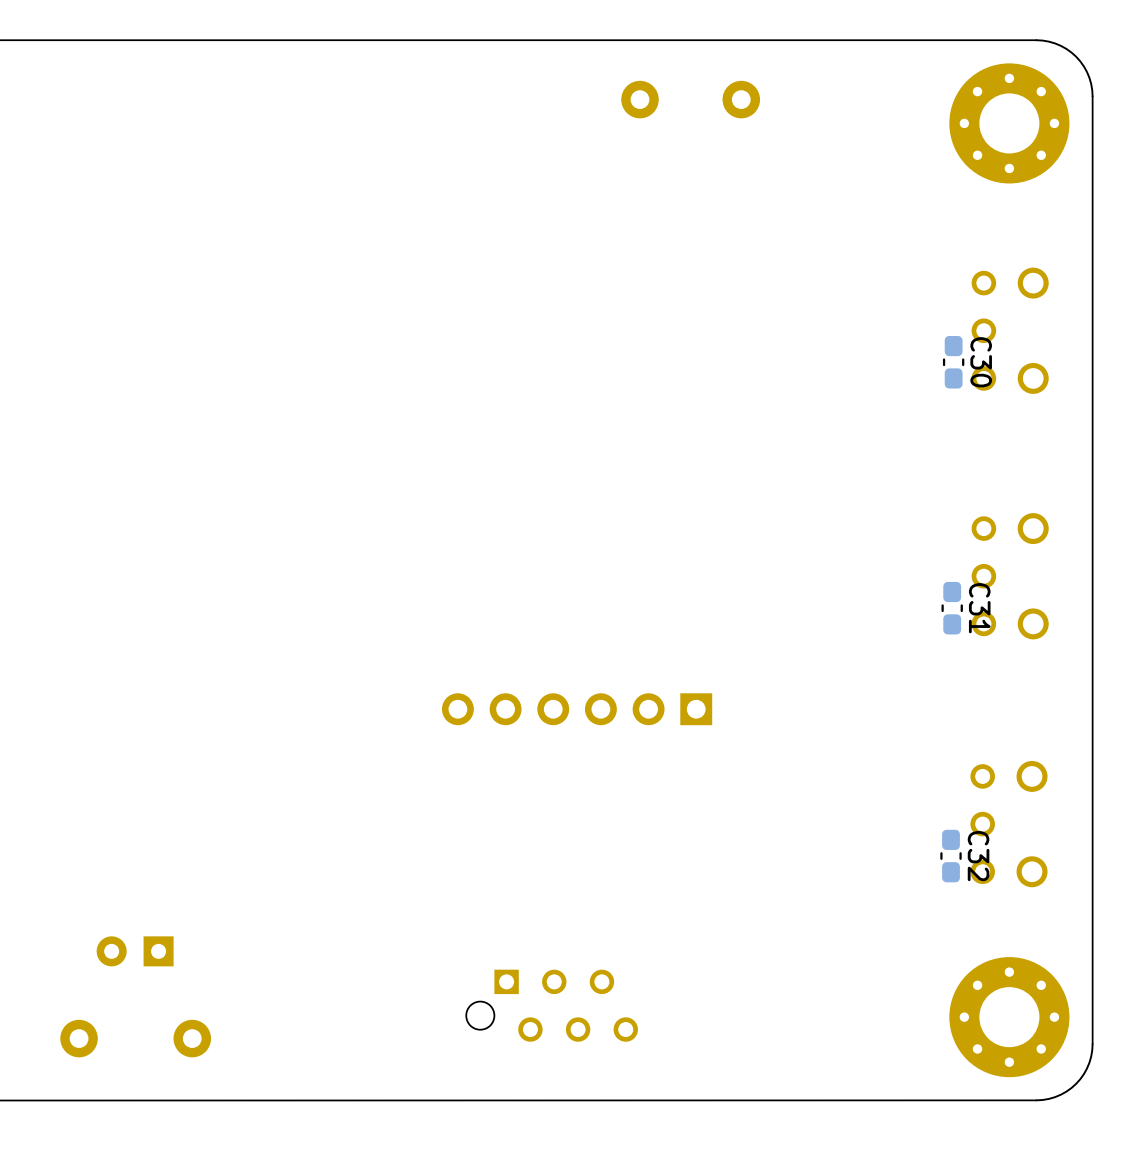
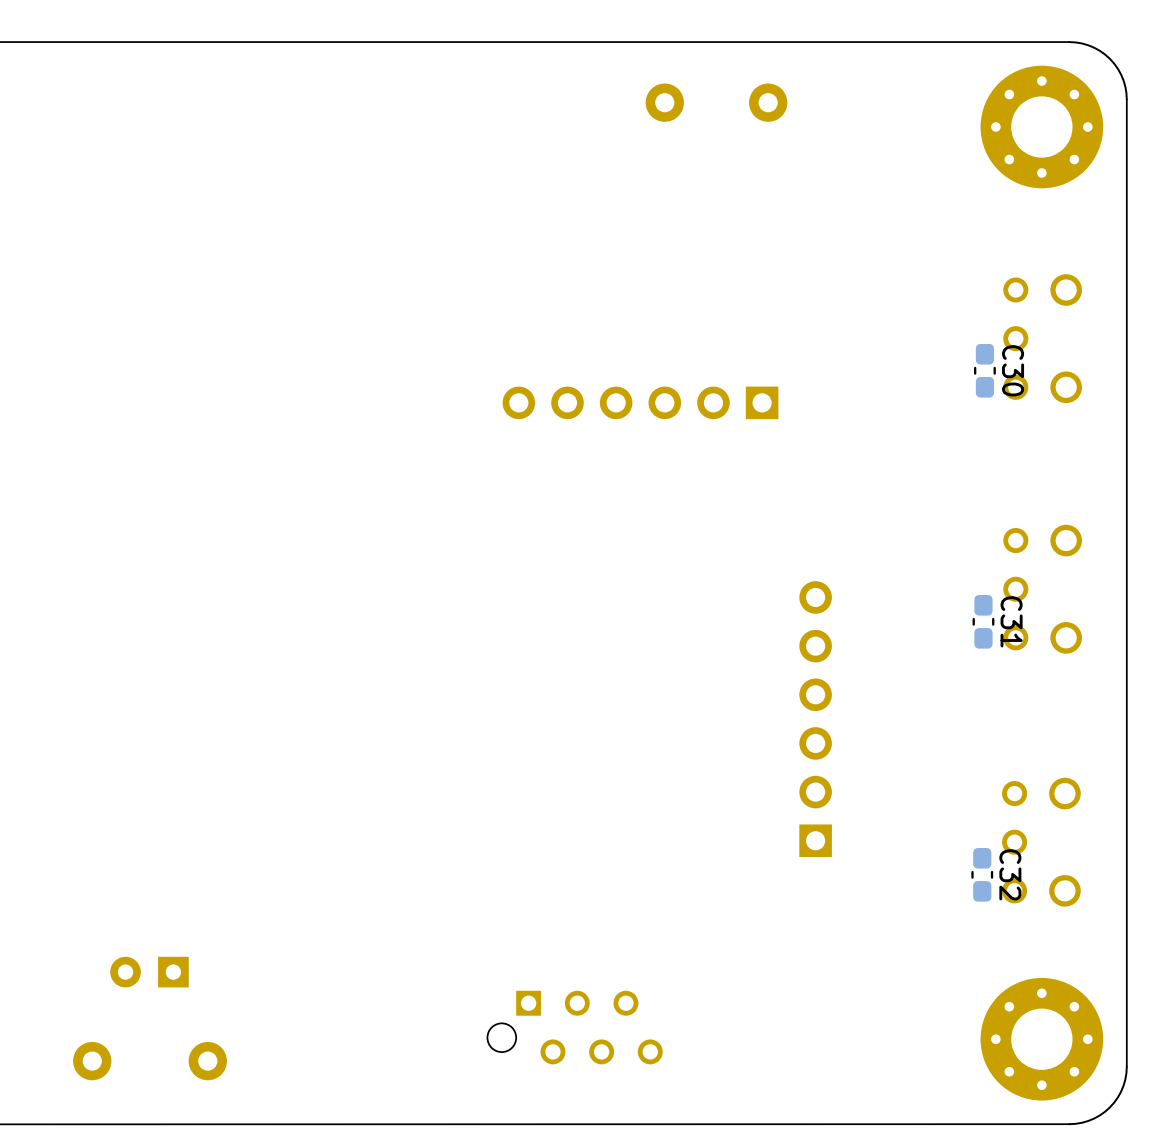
part: none -> (640, 402)
part: none -> (815, 719)
part: (577, 709) -> none

